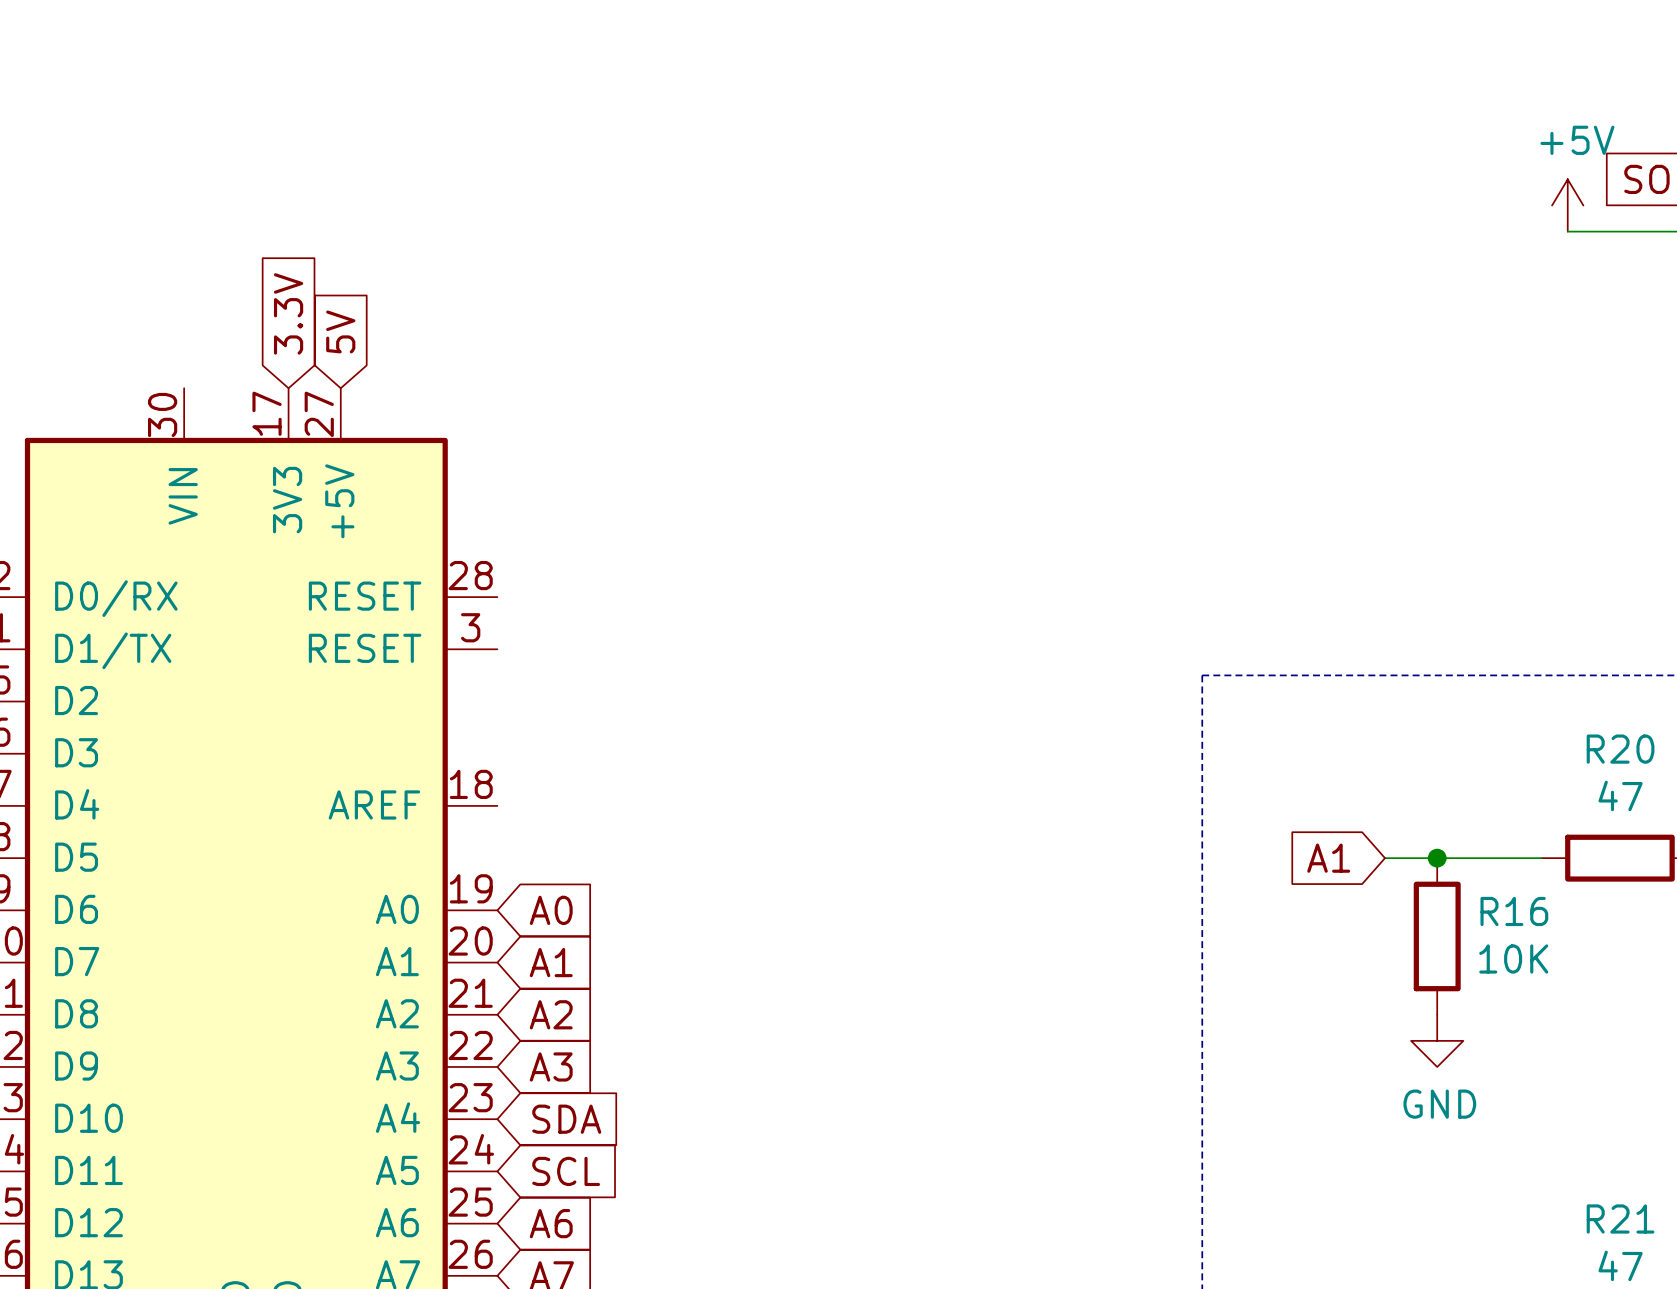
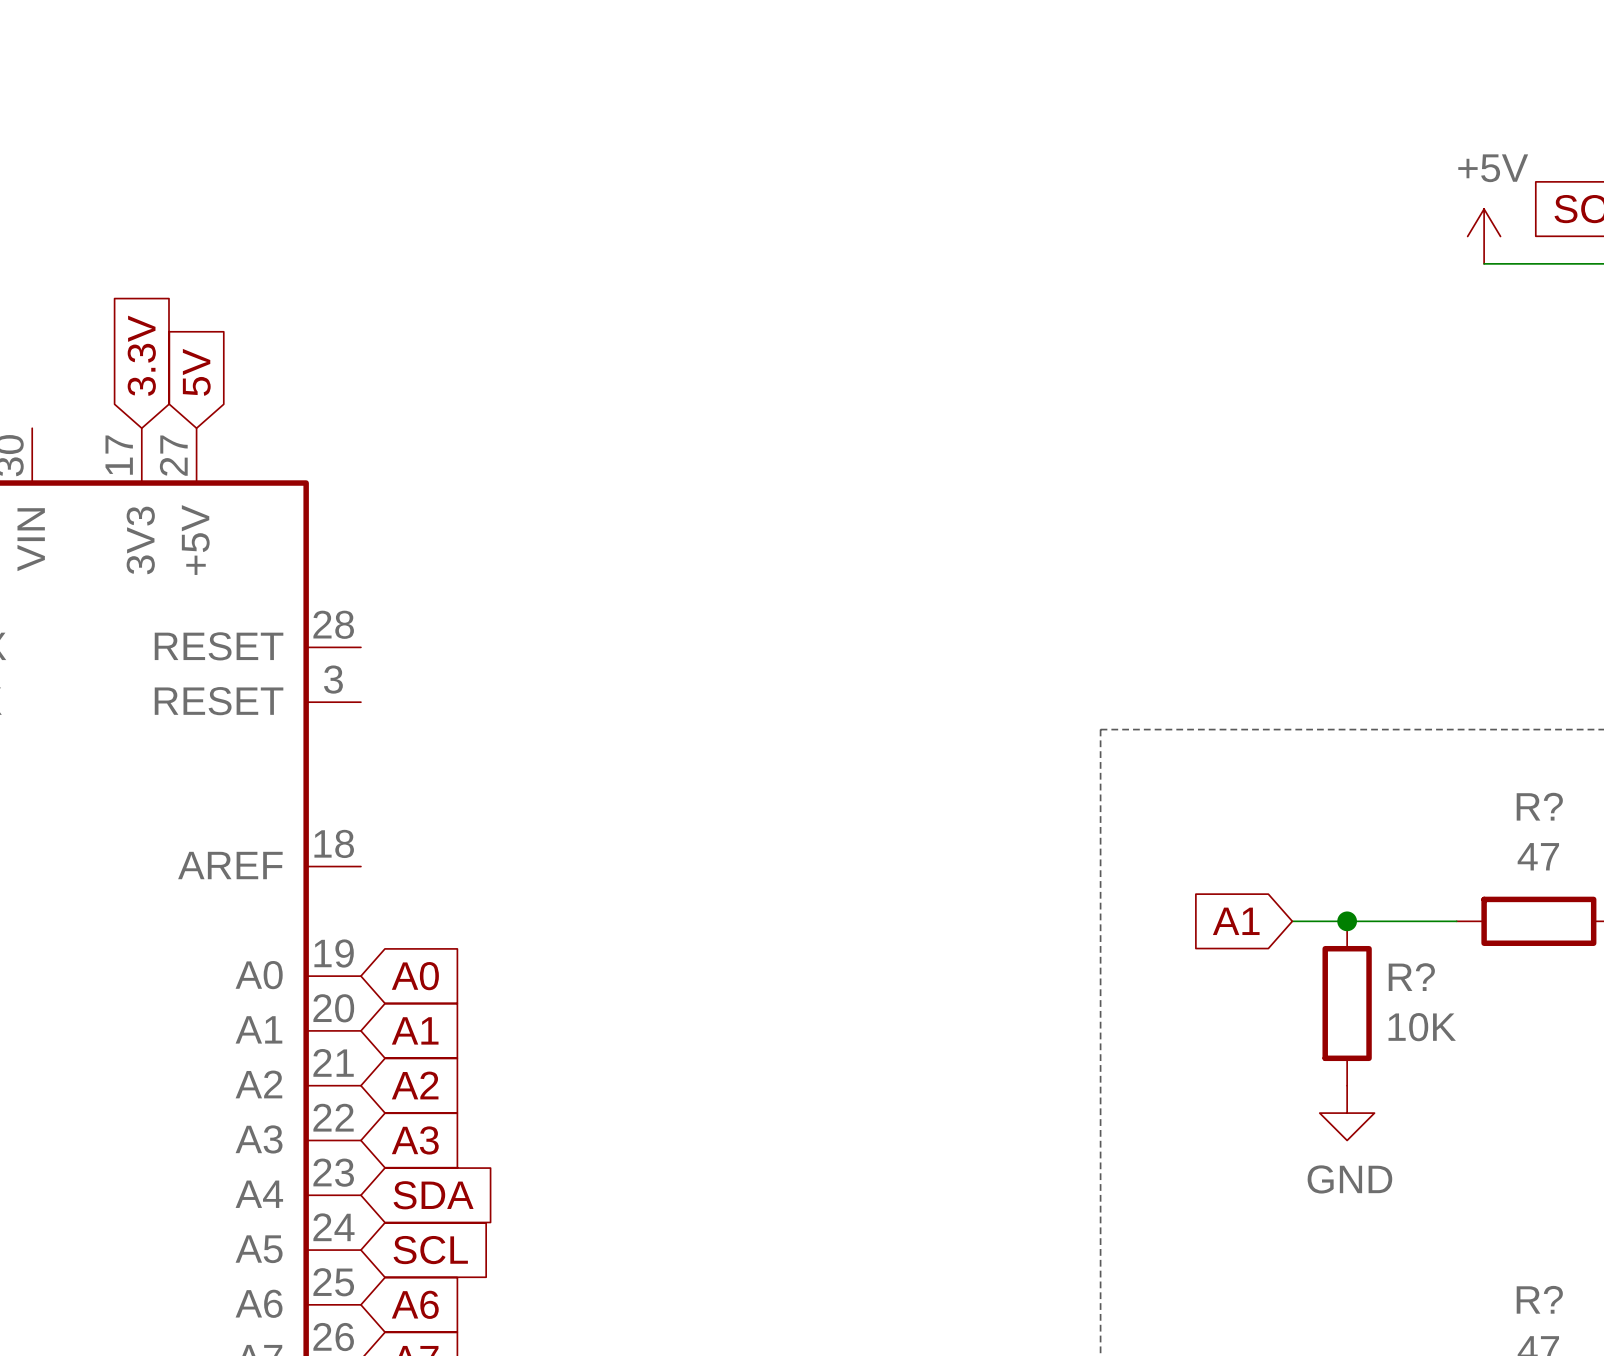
R20 name: R20 (1620, 749) -> R? (1539, 806)
R16 name: R16 (1514, 911) -> R? (1411, 977)
R21 name: R21 (1620, 1218) -> R? (1539, 1299)

